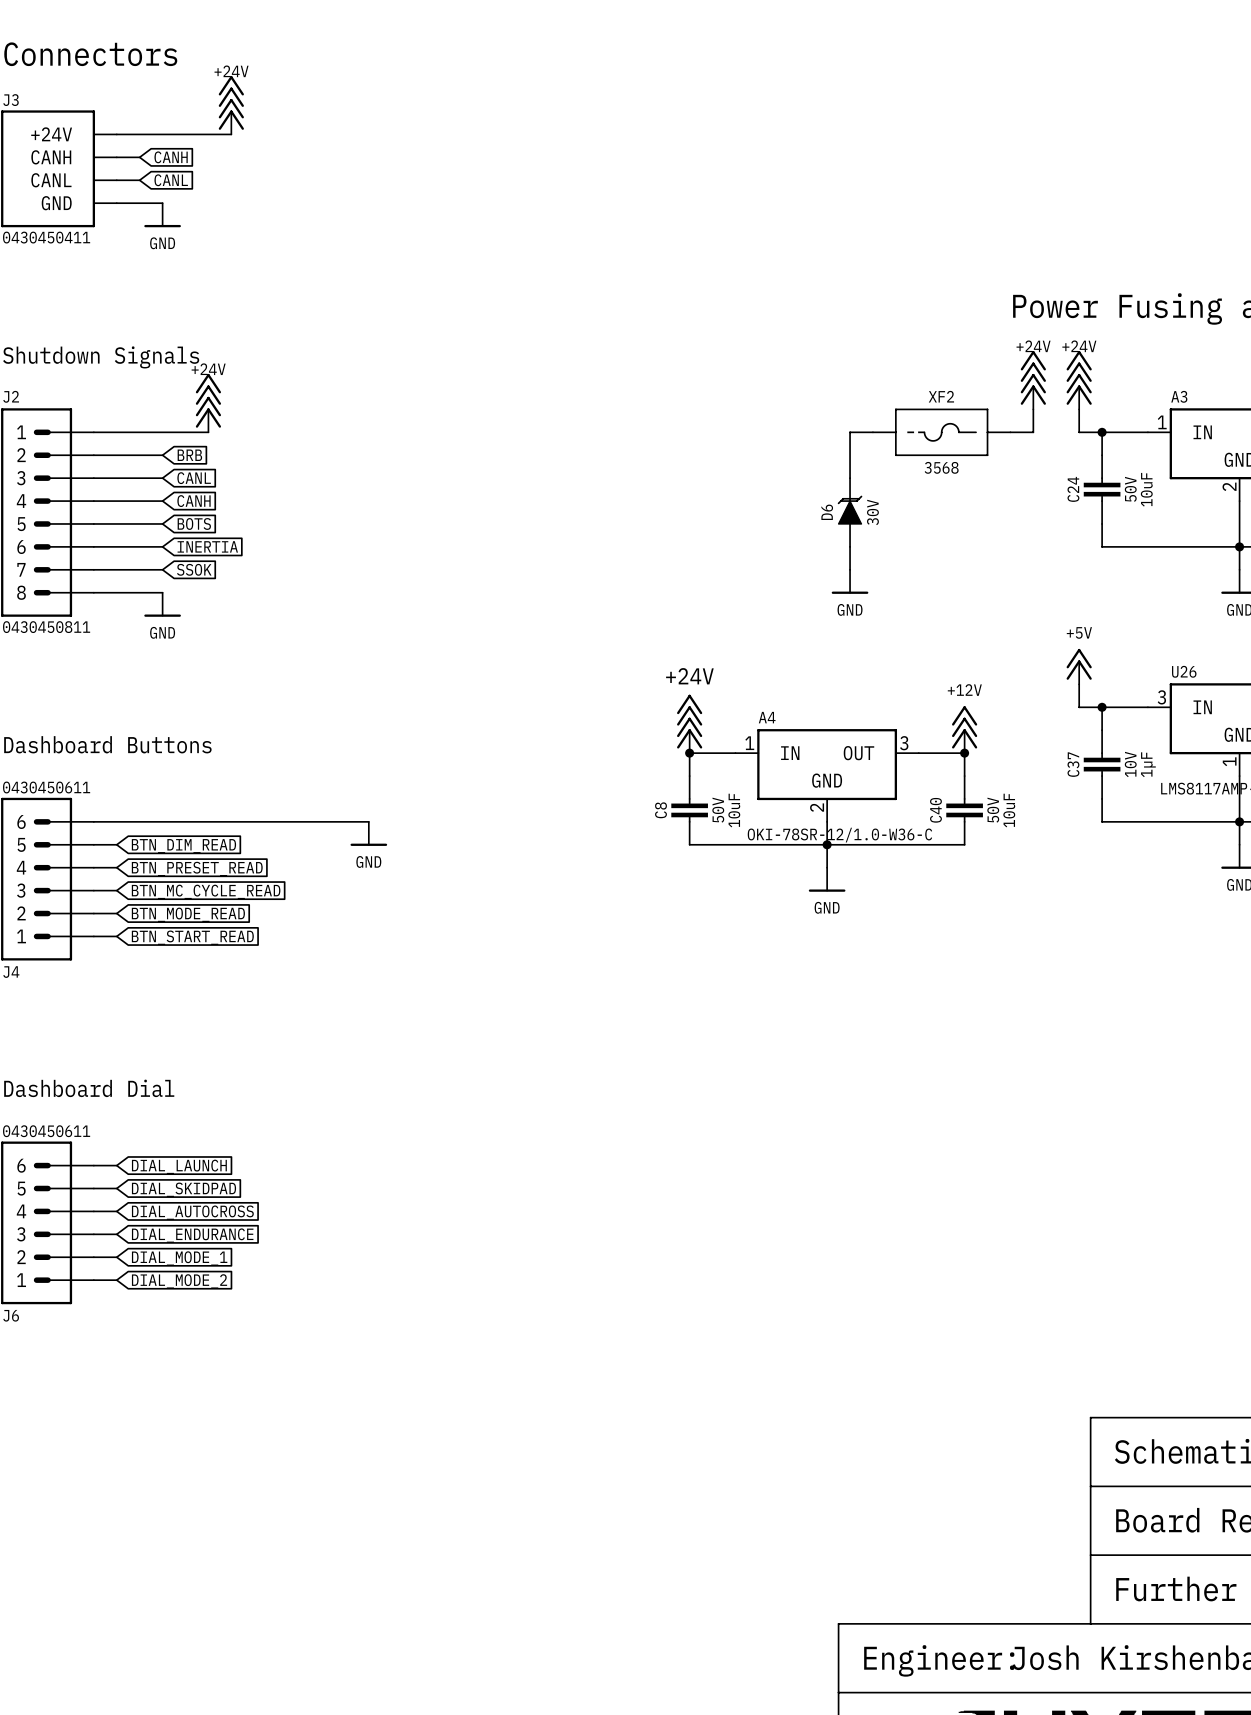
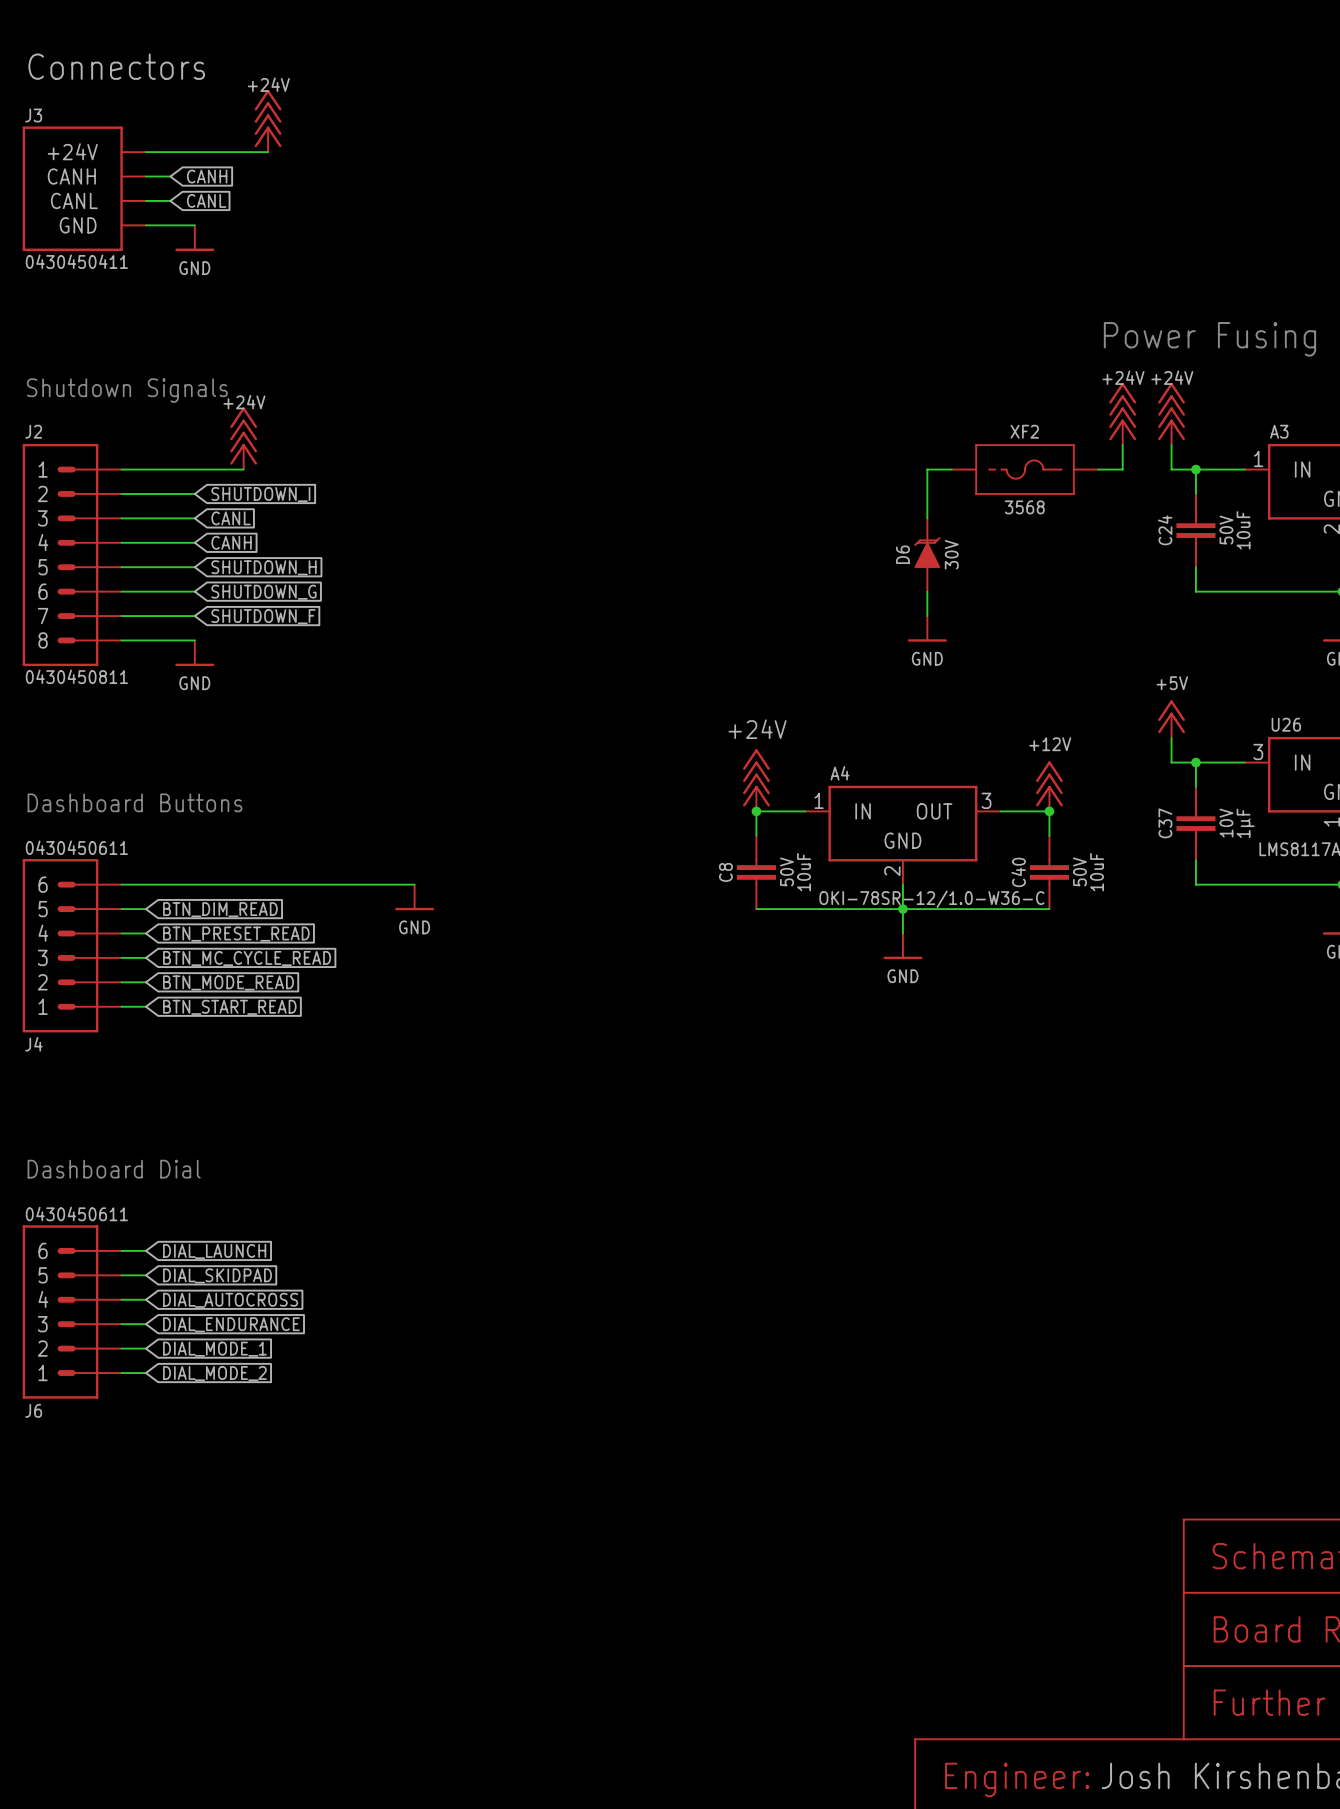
global label: BRB (189, 455) -> SHUTDOWN_I (260, 494)
global label: BOTS (194, 523) -> SHUTDOWN_H (264, 567)
global label: INERTIA (207, 546) -> SHUTDOWN_G (264, 592)
global label: SSOK (194, 569) -> SHUTDOWN_F (263, 616)

